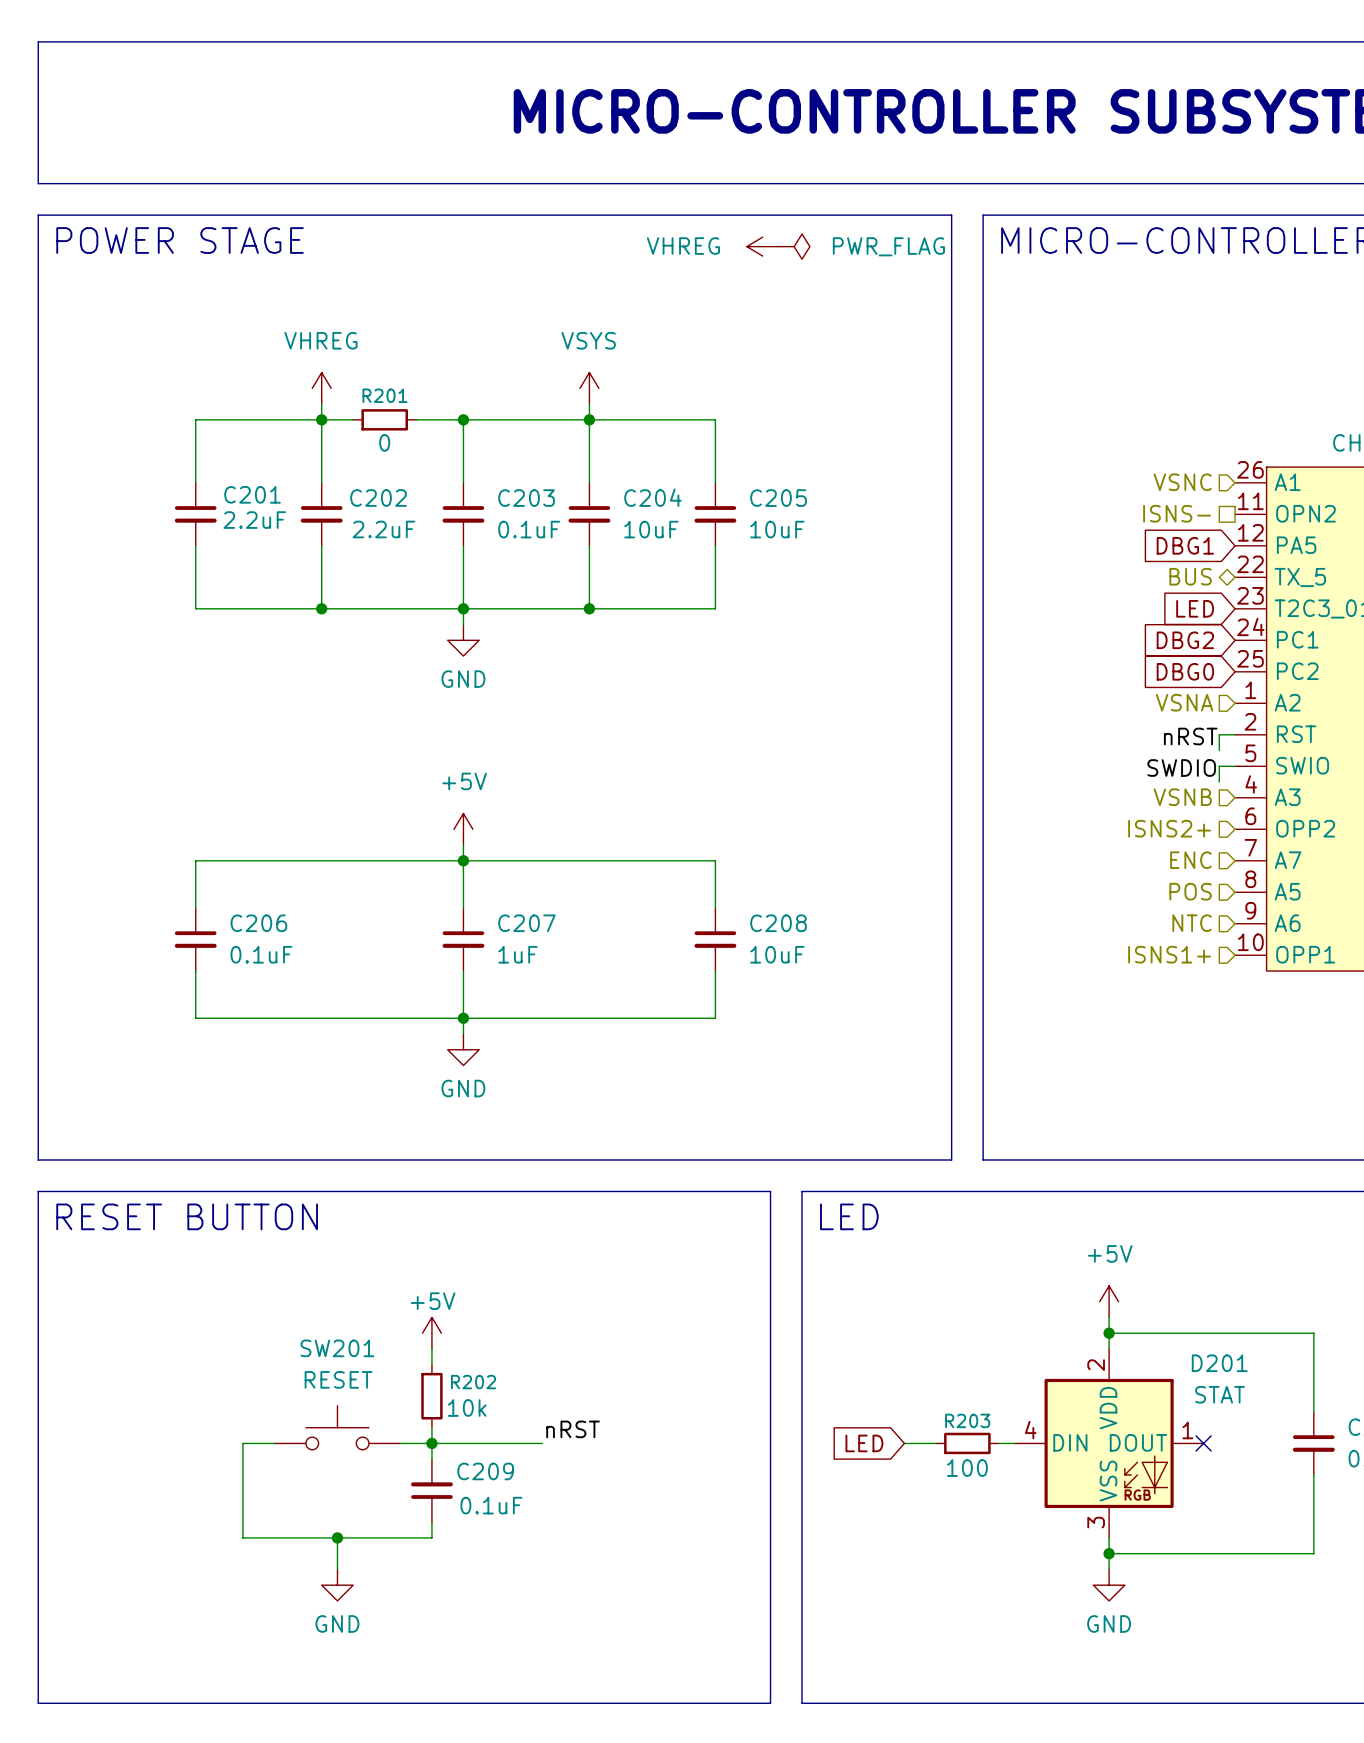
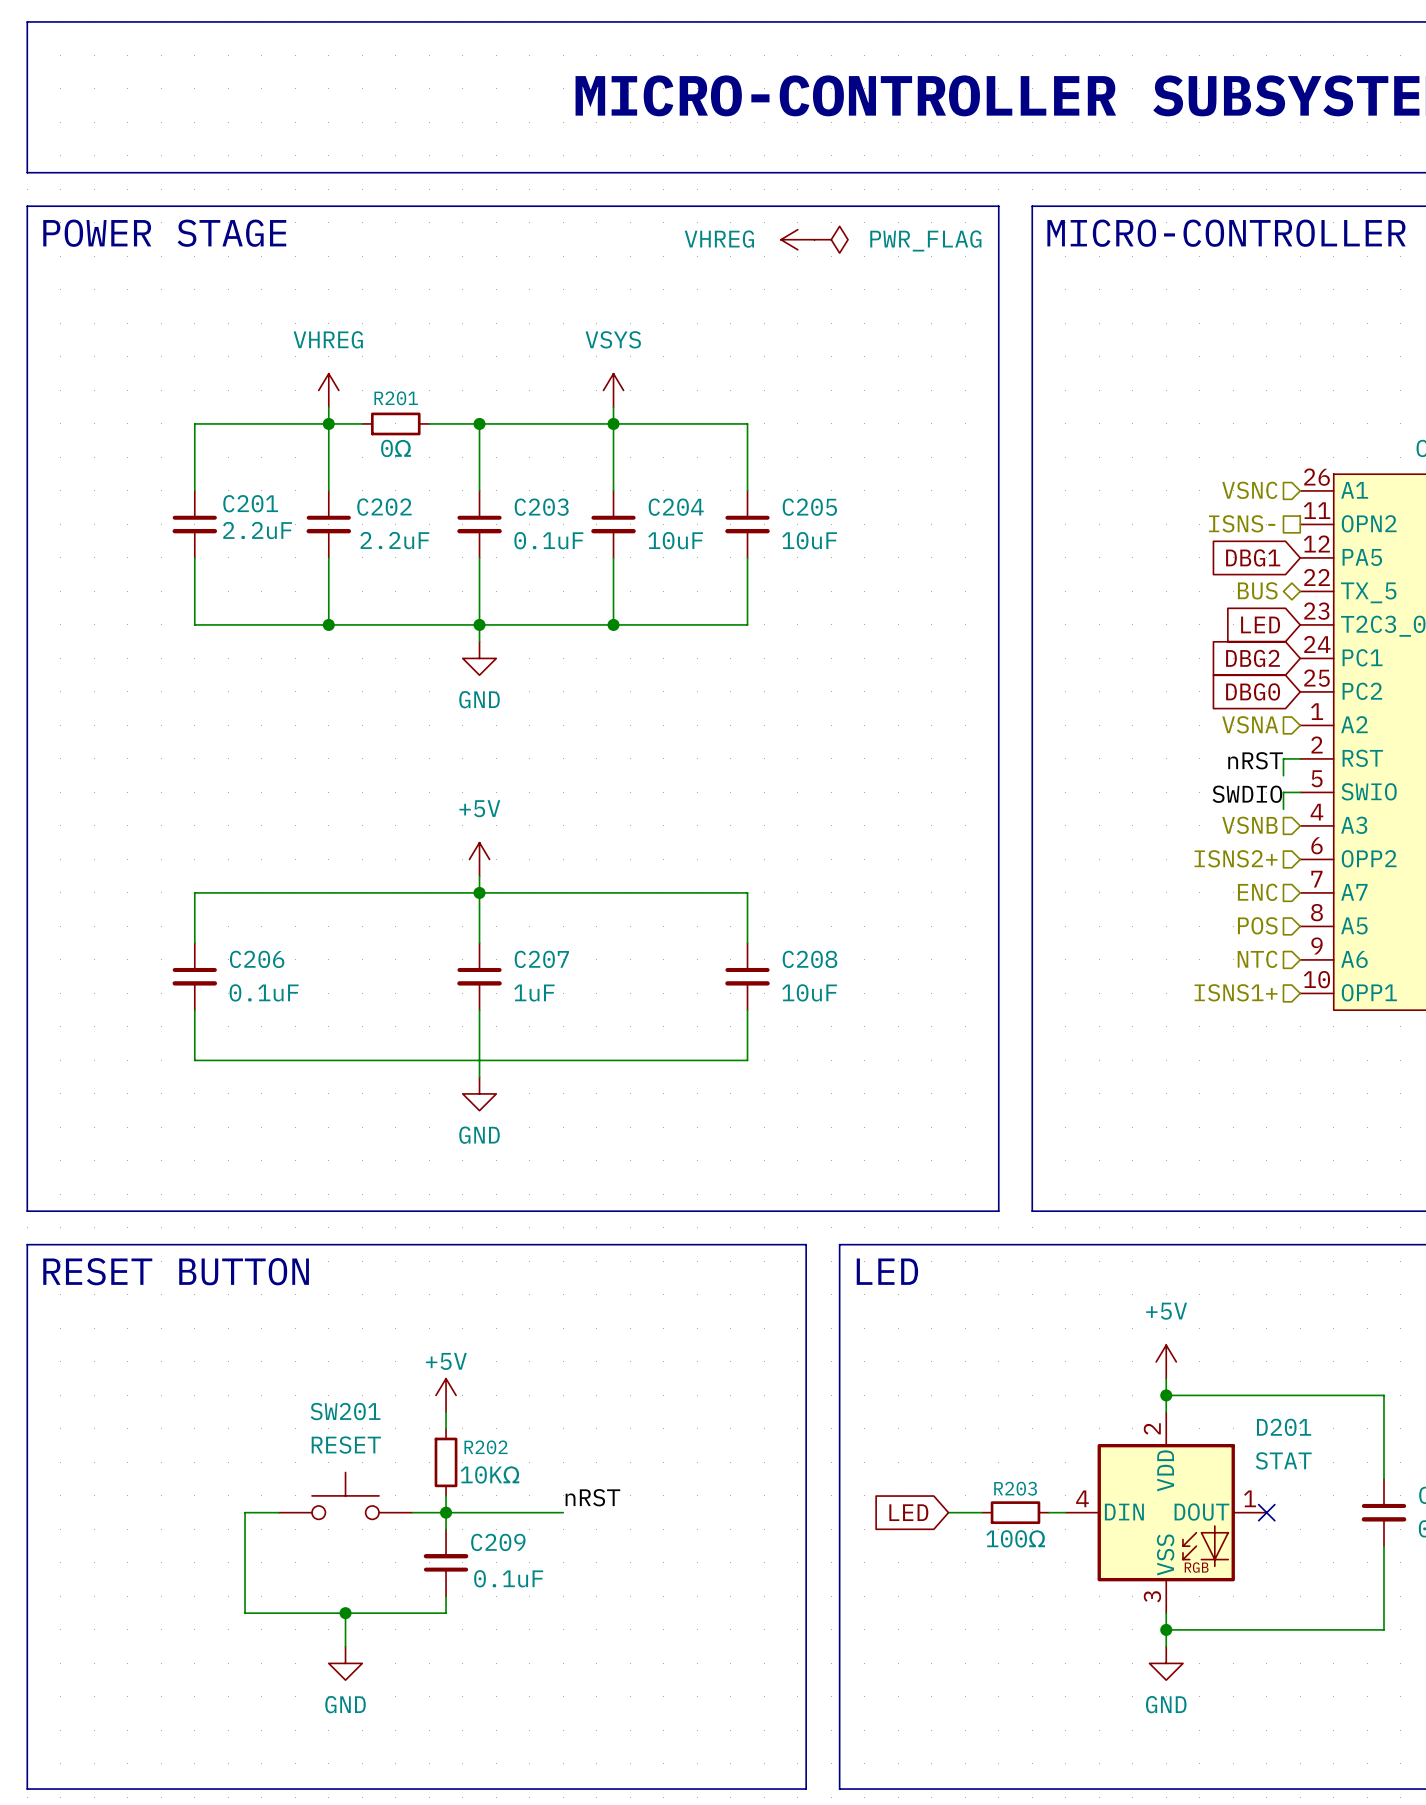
R201 value: 0 (384, 442) -> 0Ω (396, 448)
junction: (463, 1018) -> none
R202 value: 10k (467, 1407) -> 10KΩ (490, 1474)
R203 value: 100 (967, 1468) -> 100Ω (1015, 1538)

